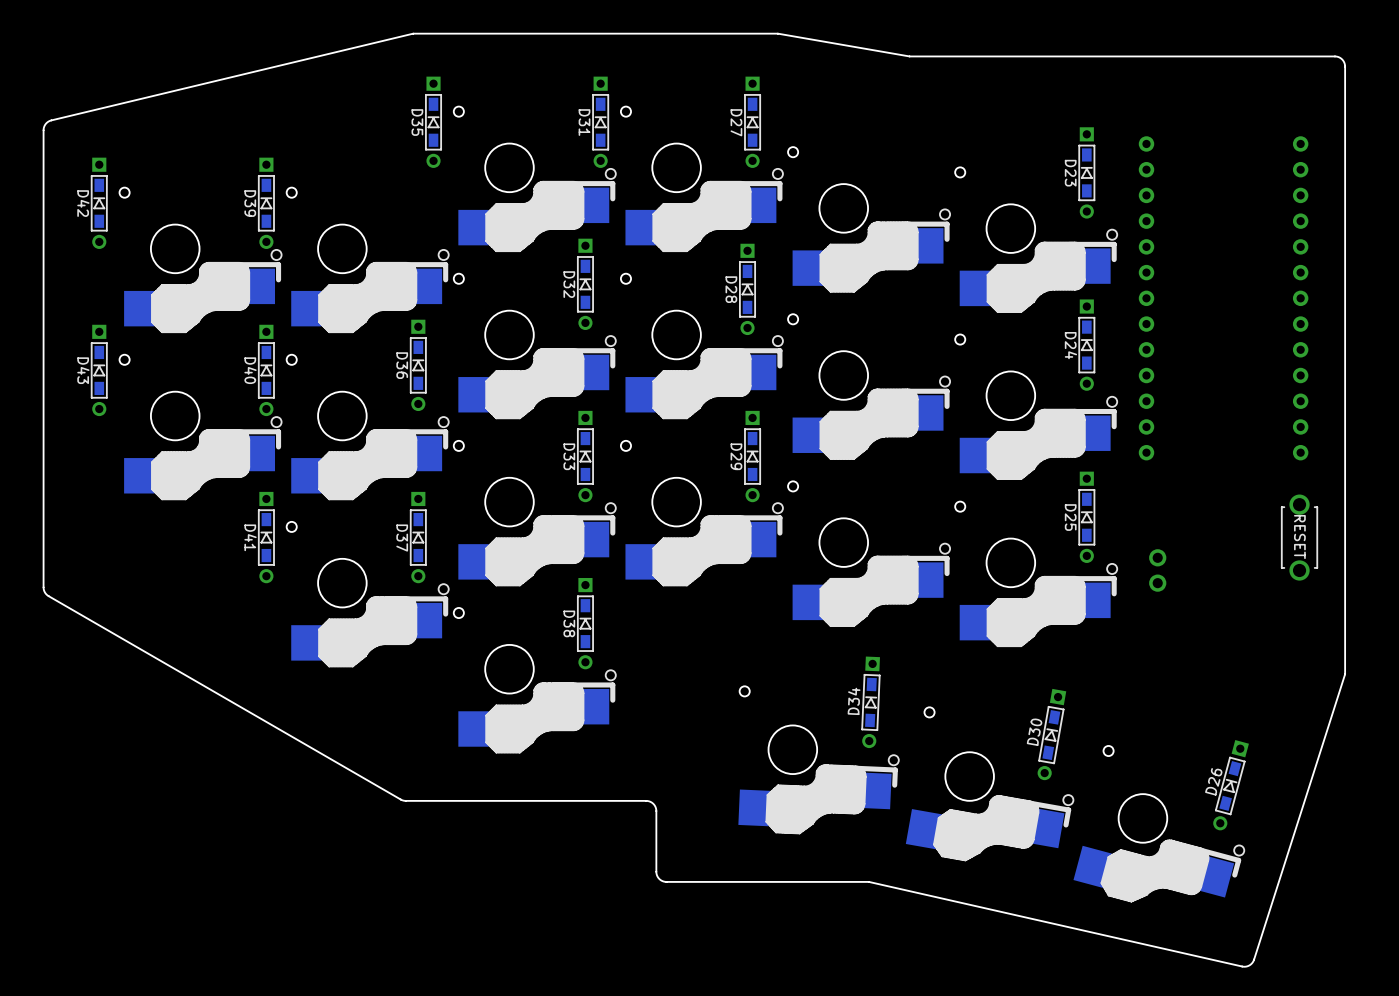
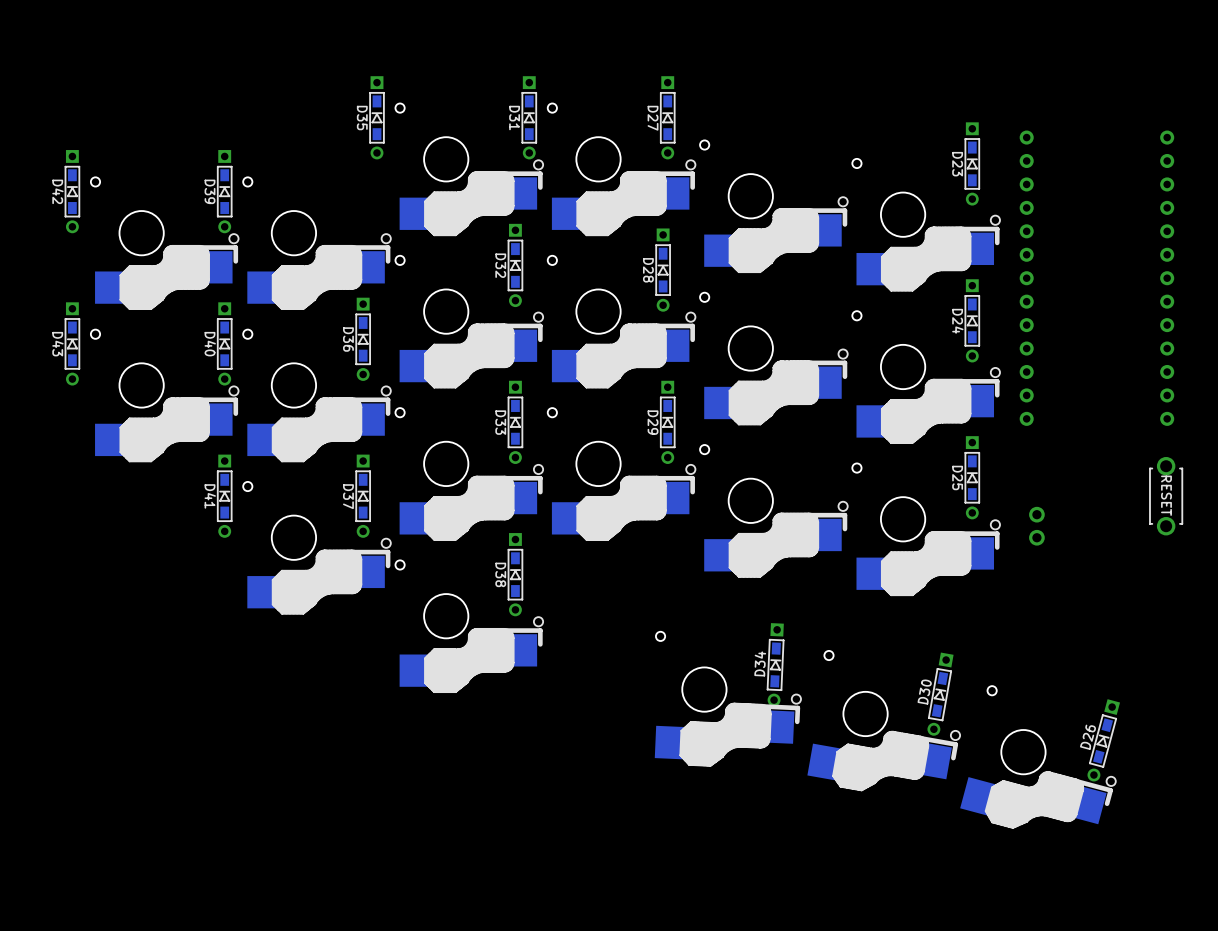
board edge: (777, 33) (413, 33) (47, 122) (43, 130) (44, 591) (48, 596) (402, 800) (650, 801) (656, 809) (656, 872) (658, 878) (663, 881) (869, 881) (1242, 966) (1249, 965) (1254, 959) (1345, 674) (1344, 62) (1340, 58) (1334, 56) (909, 56) (777, 33) -> none
D34 position: (870, 702) -> (775, 664)
D30 position: (1051, 734) -> (940, 694)
D26 position: (1231, 785) -> (1103, 740)

